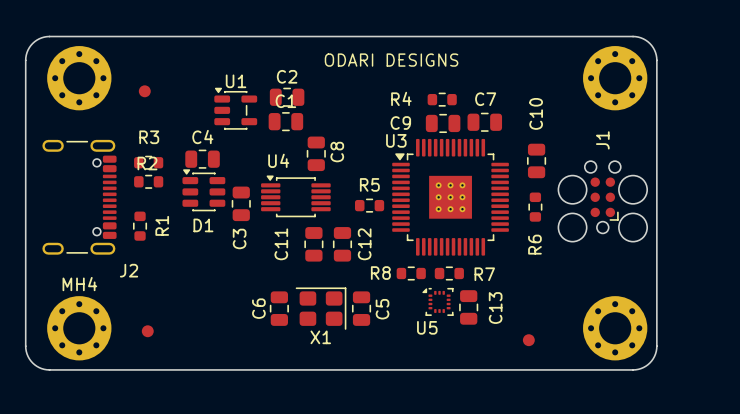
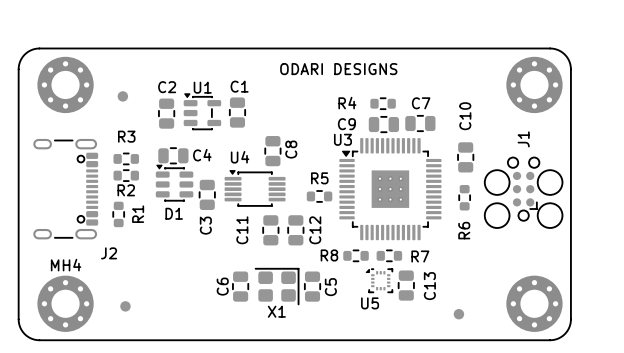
C2 rotation: 0° (287, 97) -> 90° clockwise (166, 113)
C2 position: (287, 97) -> (166, 113)
C1 rotation: 0° (285, 121) -> 90° clockwise (237, 112)
C4 name position: C4 (202, 137) -> C4 (202, 155)
R2 name position: R2 (147, 163) -> R2 (126, 190)

